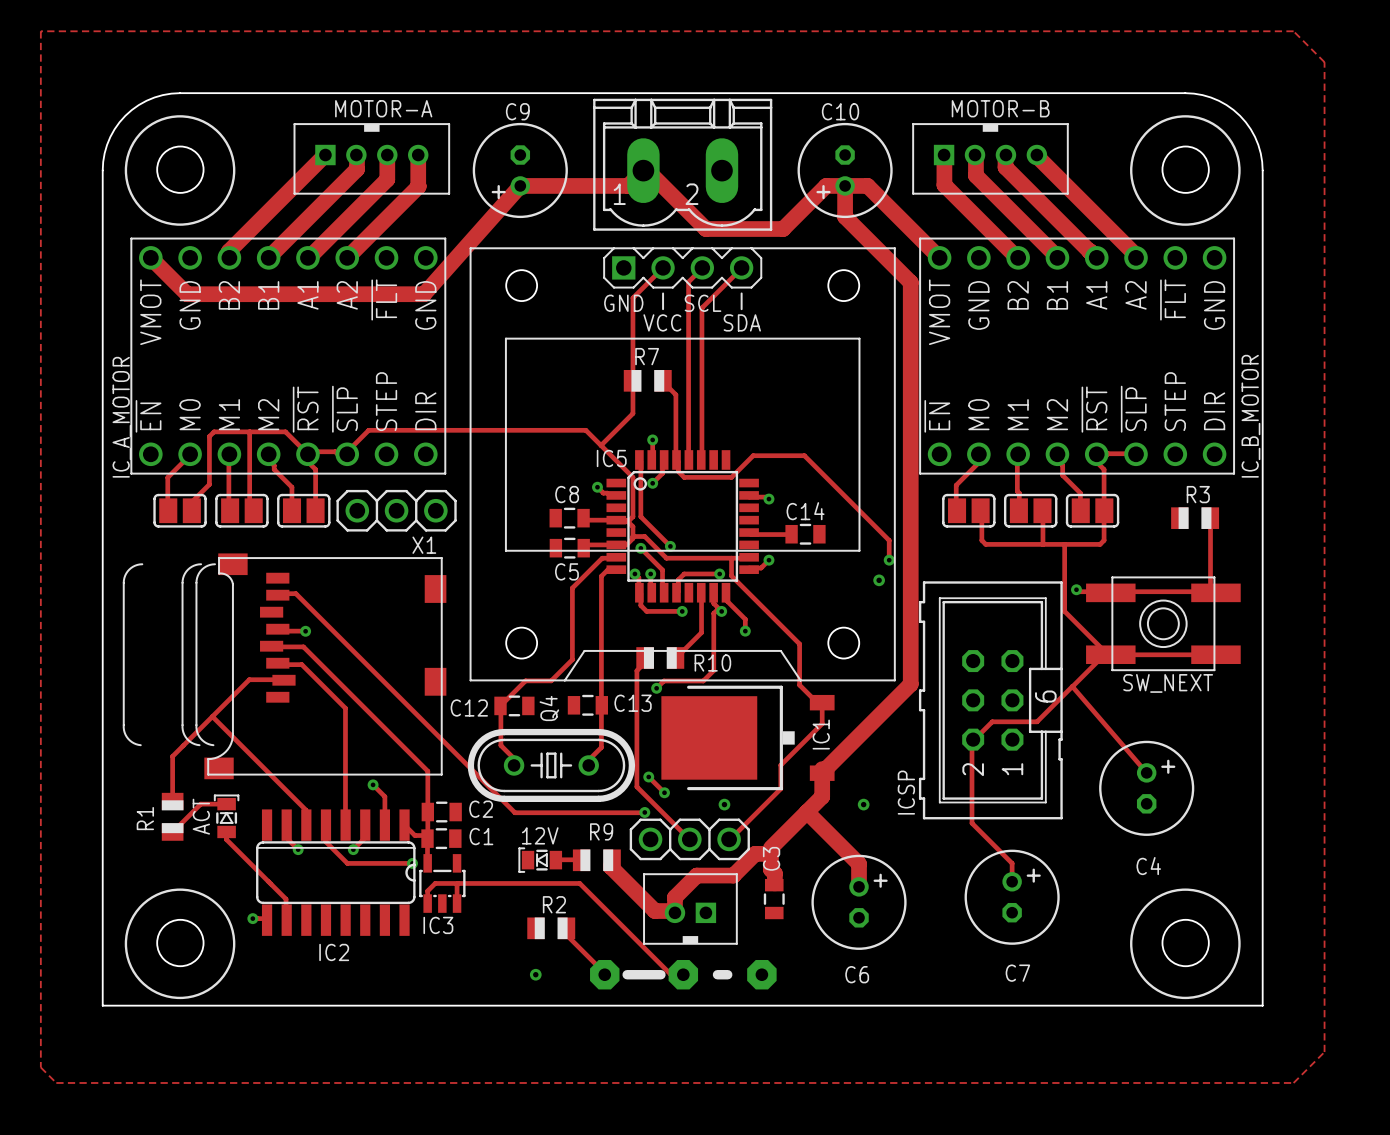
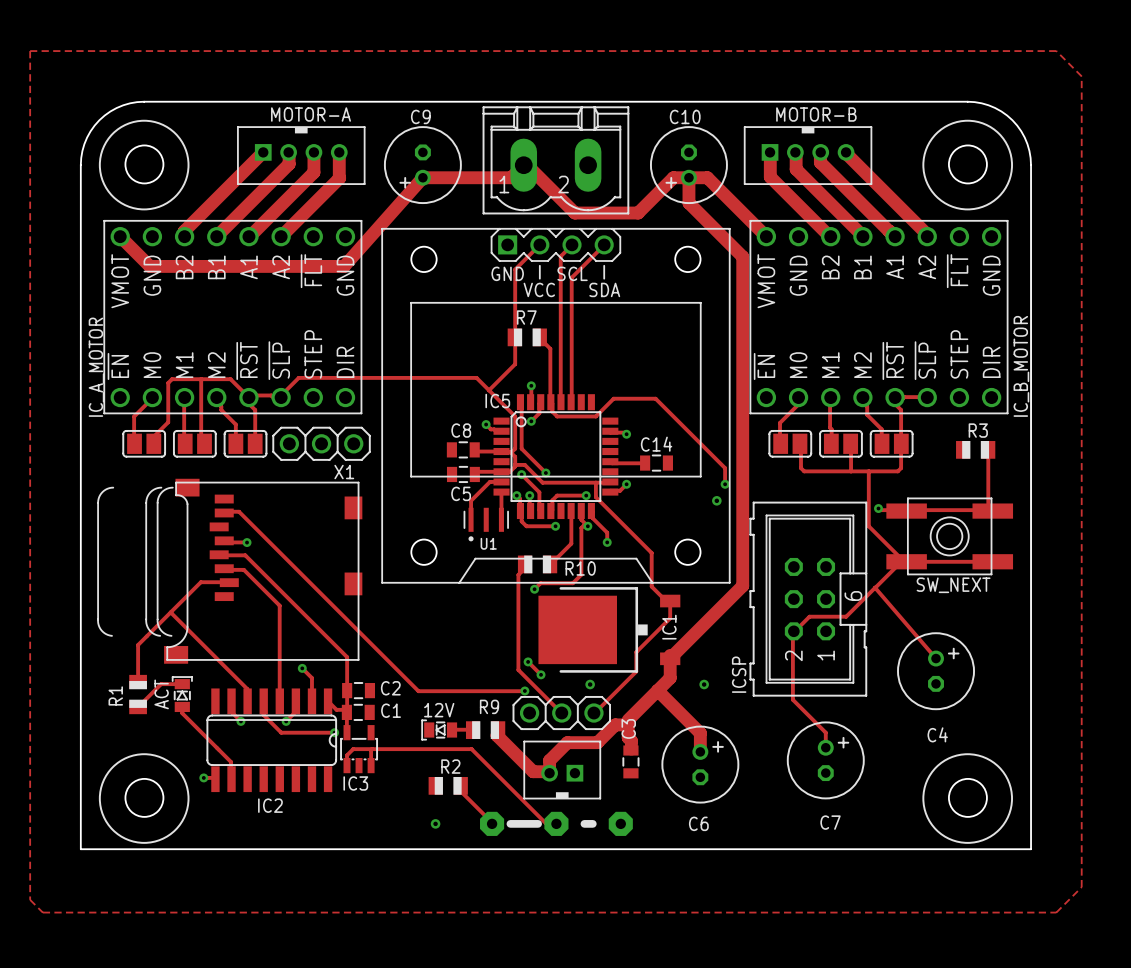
track: (616, 557) (602, 558) (572, 588) (572, 659) (551, 680) (525, 680) (500, 705) (500, 745) (512, 757) (514, 765) -> (501, 481) (489, 481) (471, 500) (471, 519)
track: (616, 569) (608, 569) (601, 576) (601, 747) (589, 759) (588, 765) -> (501, 492) (501, 519)
U1: none -> (486, 524)
C12: (514, 705) -> none
C13: (587, 705) -> none
Q4: (551, 765) -> none

